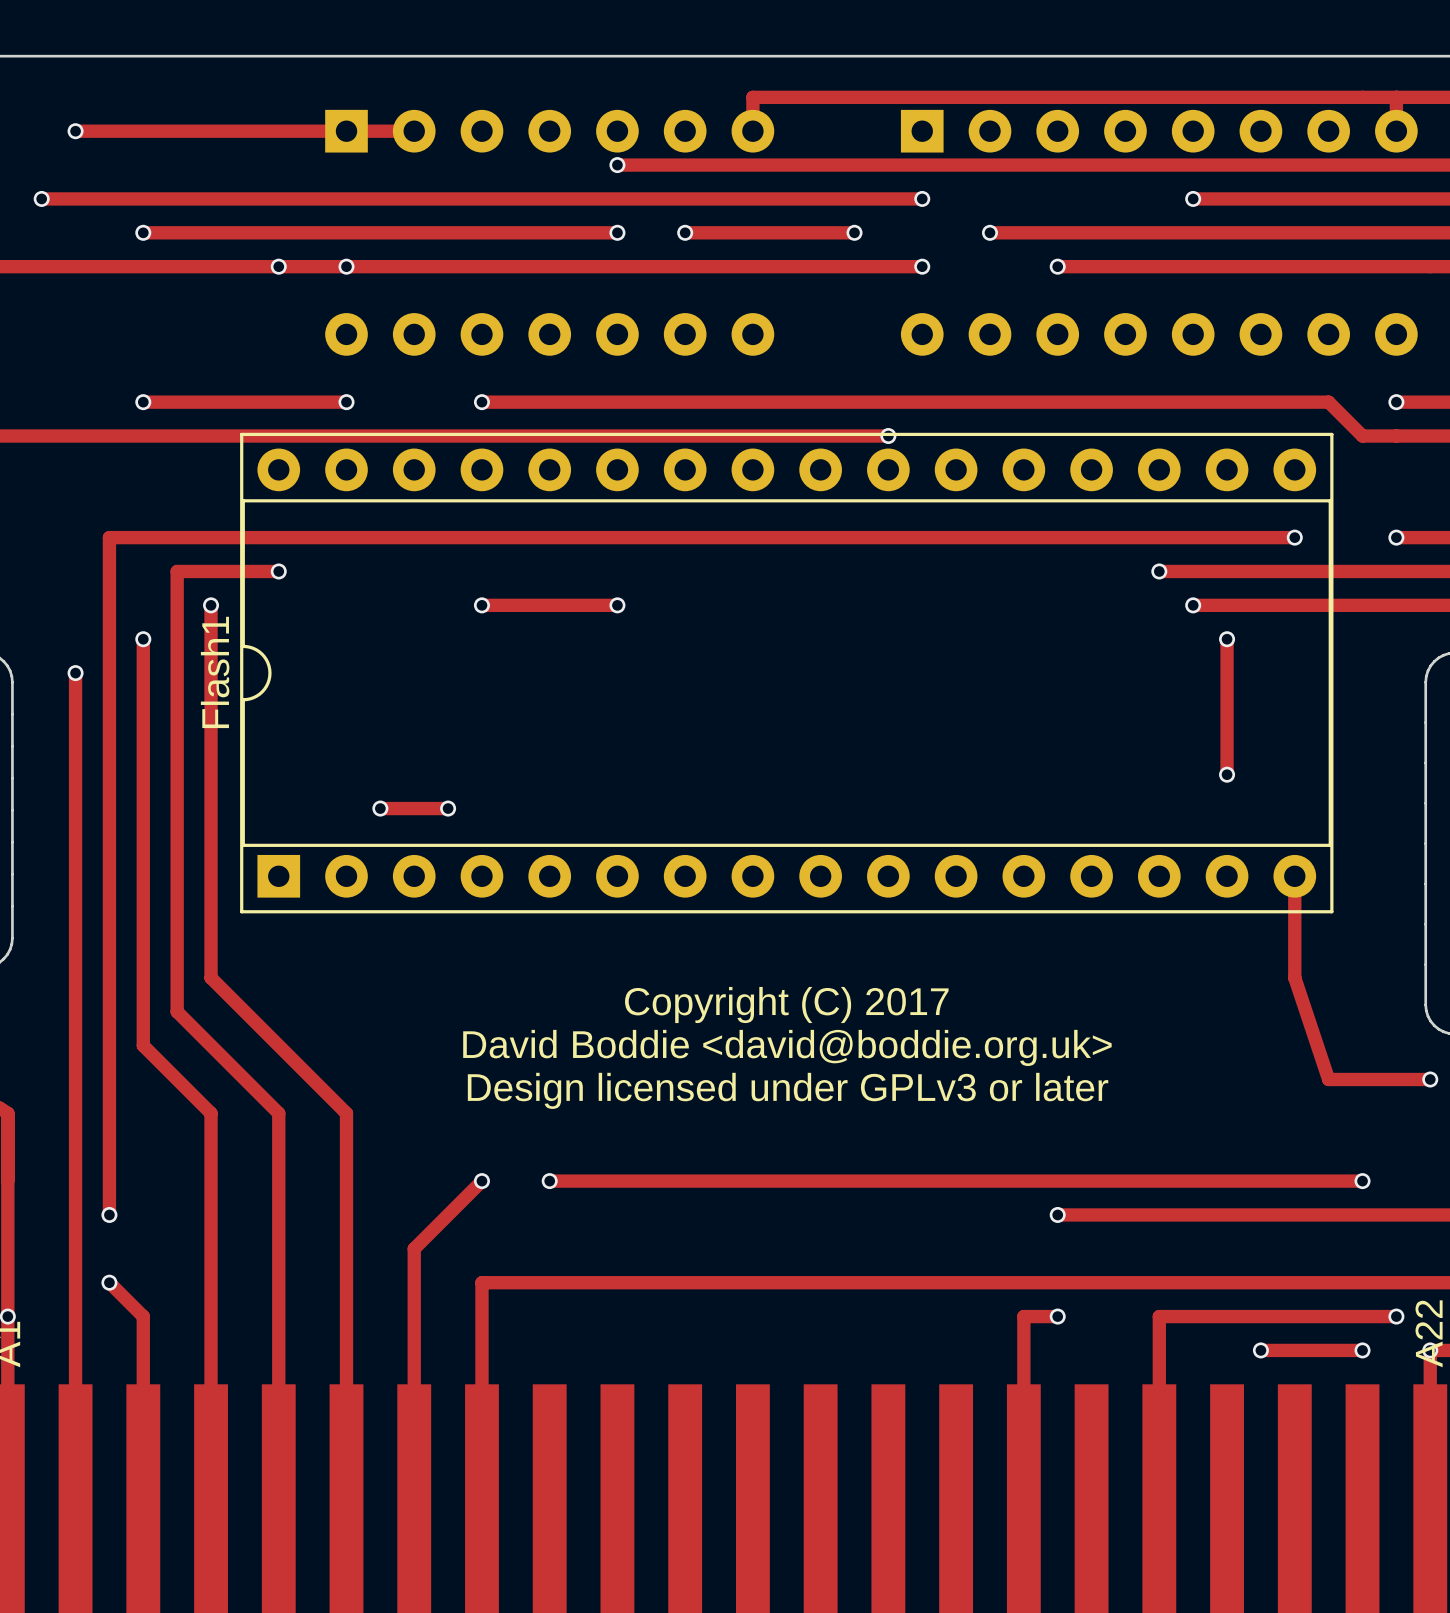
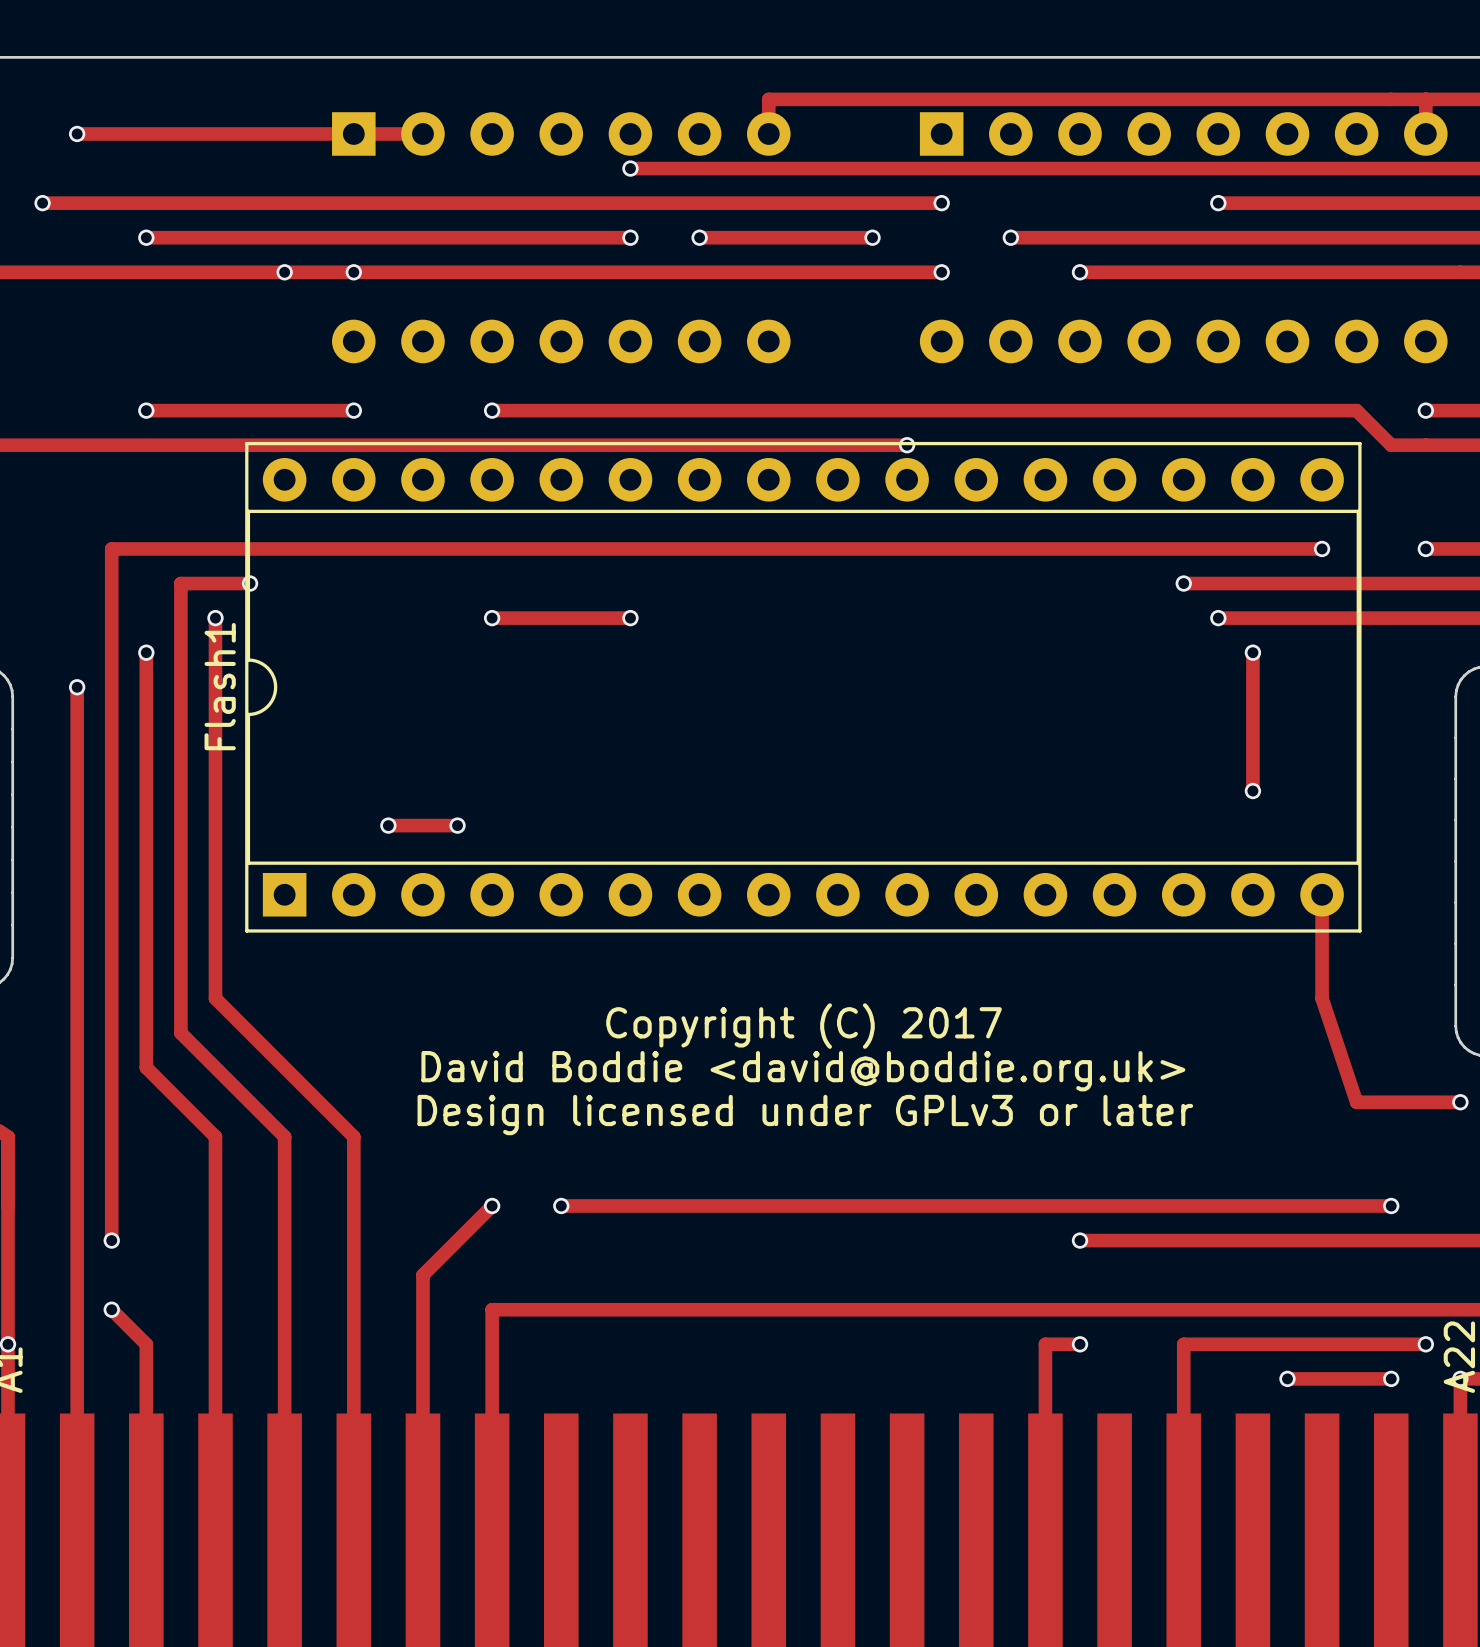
track: (244, 571) (278, 571) -> none
via position: (278, 571) -> (250, 583)

